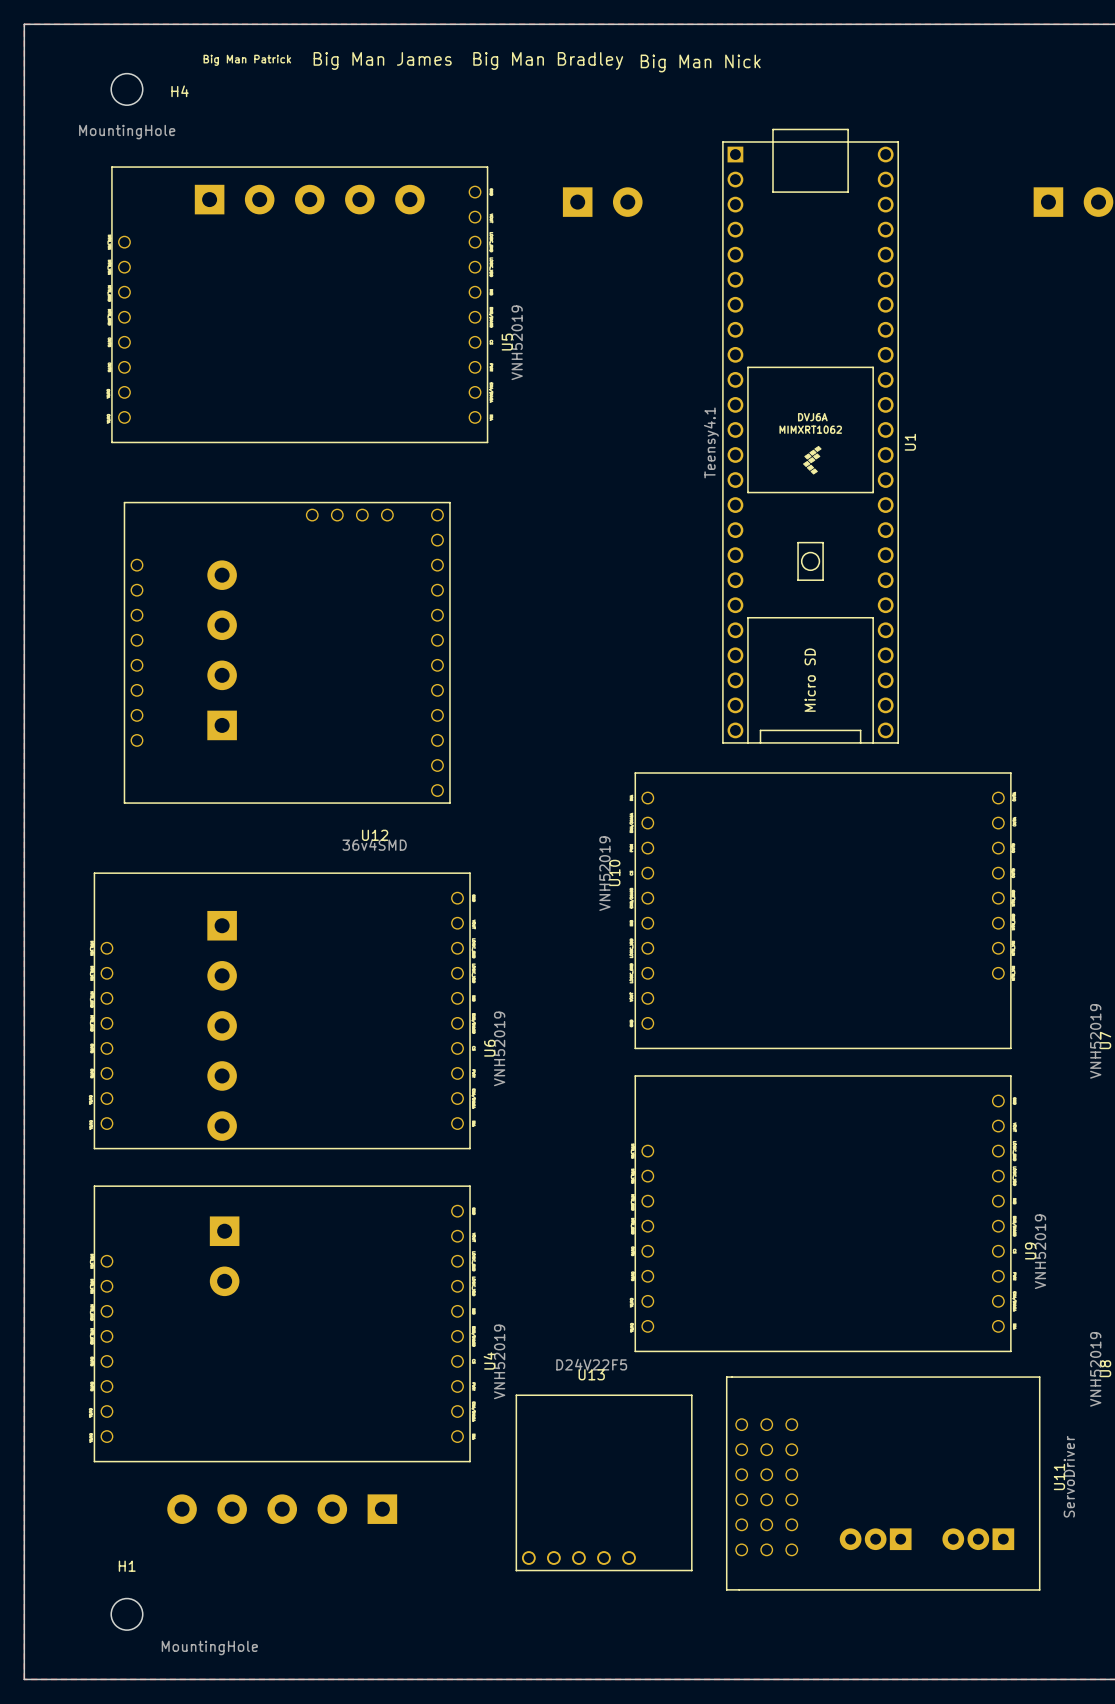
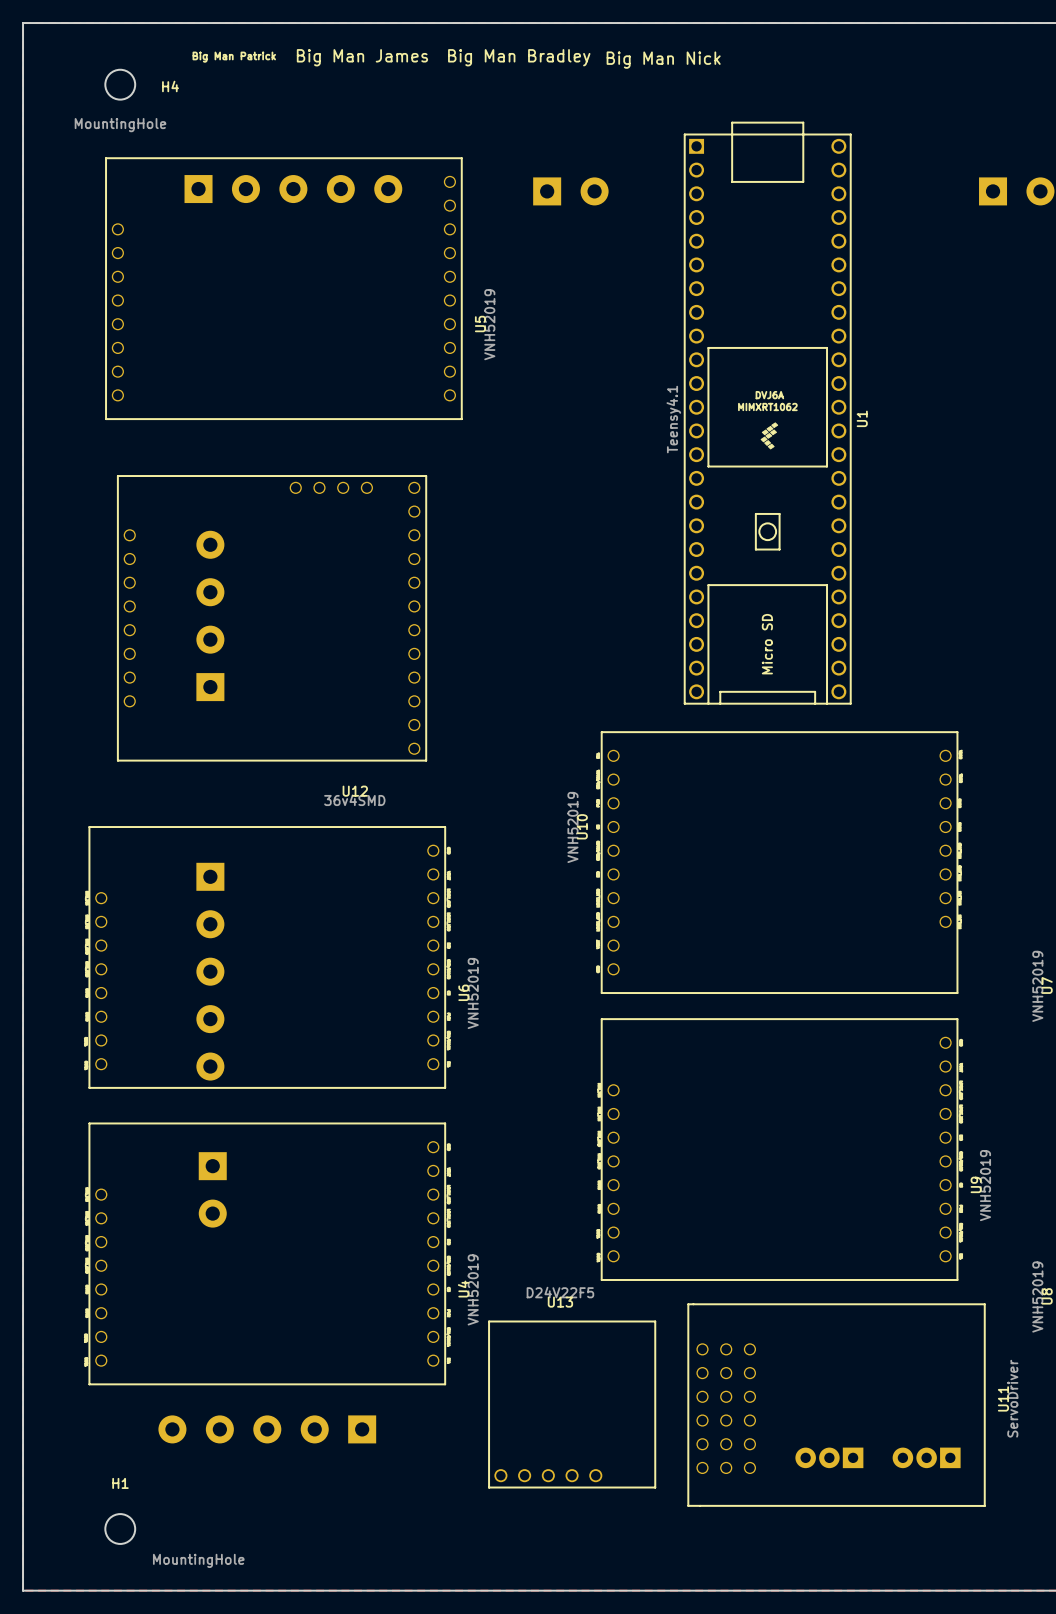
U5 footprint: [111, 166, 489, 444] -> [105, 157, 463, 420]

